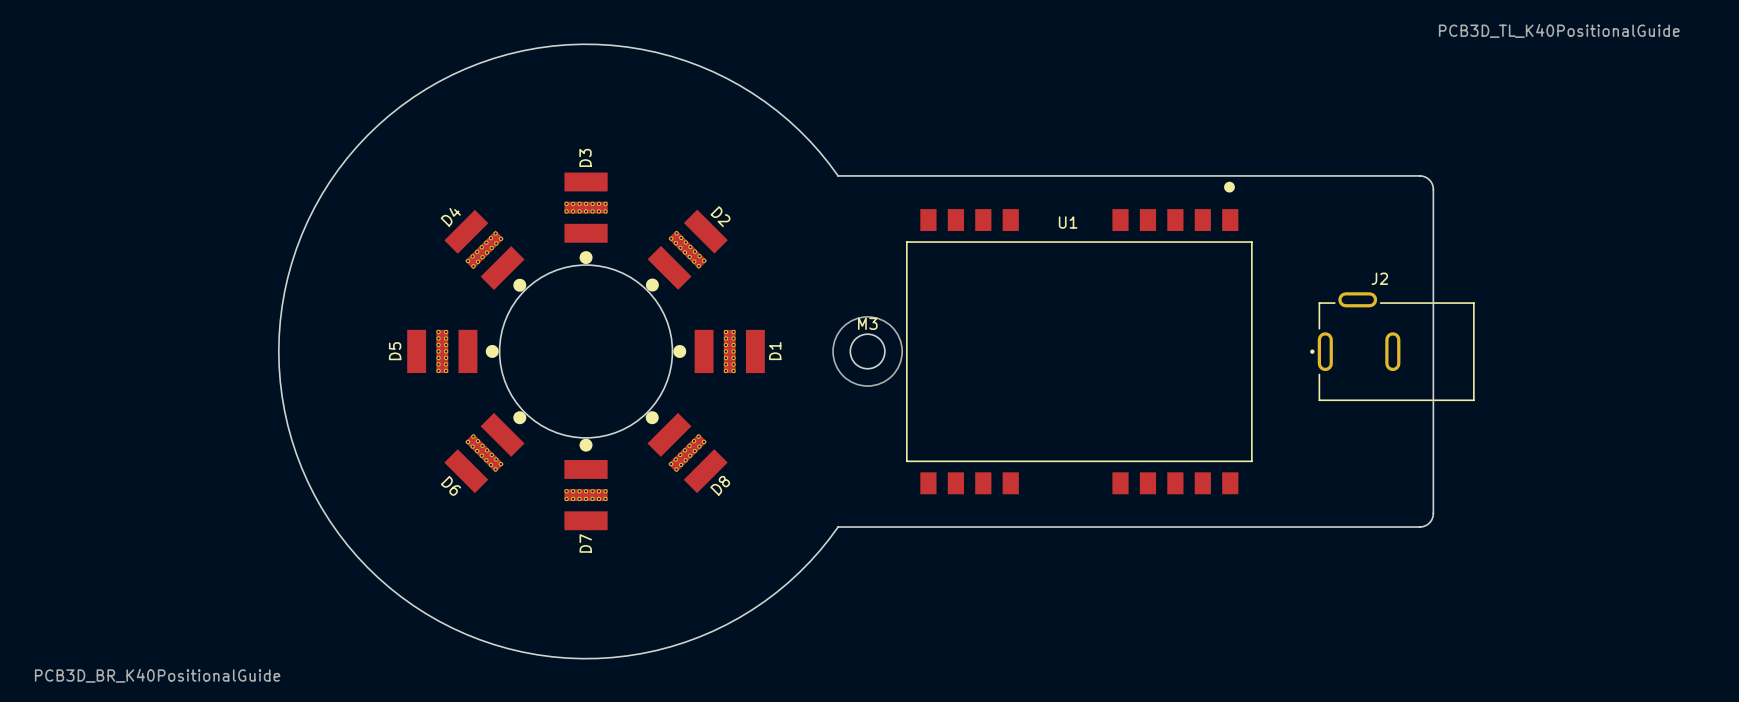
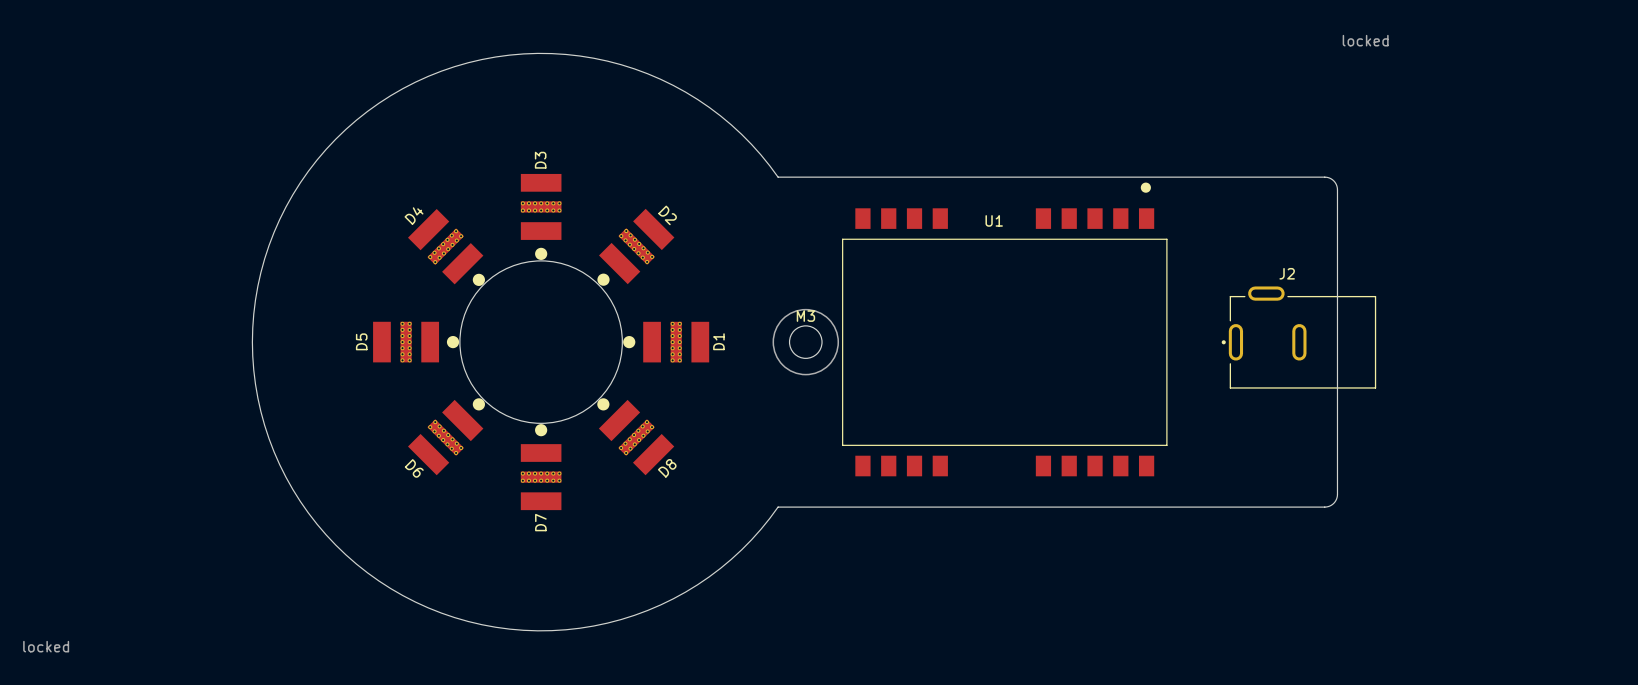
text: PCB3D_TL_K40PositionalGuide (1559, 30) -> locked (1365, 40)
text: PCB3D_BR_K40PositionalGuide (157, 675) -> locked (46, 646)

